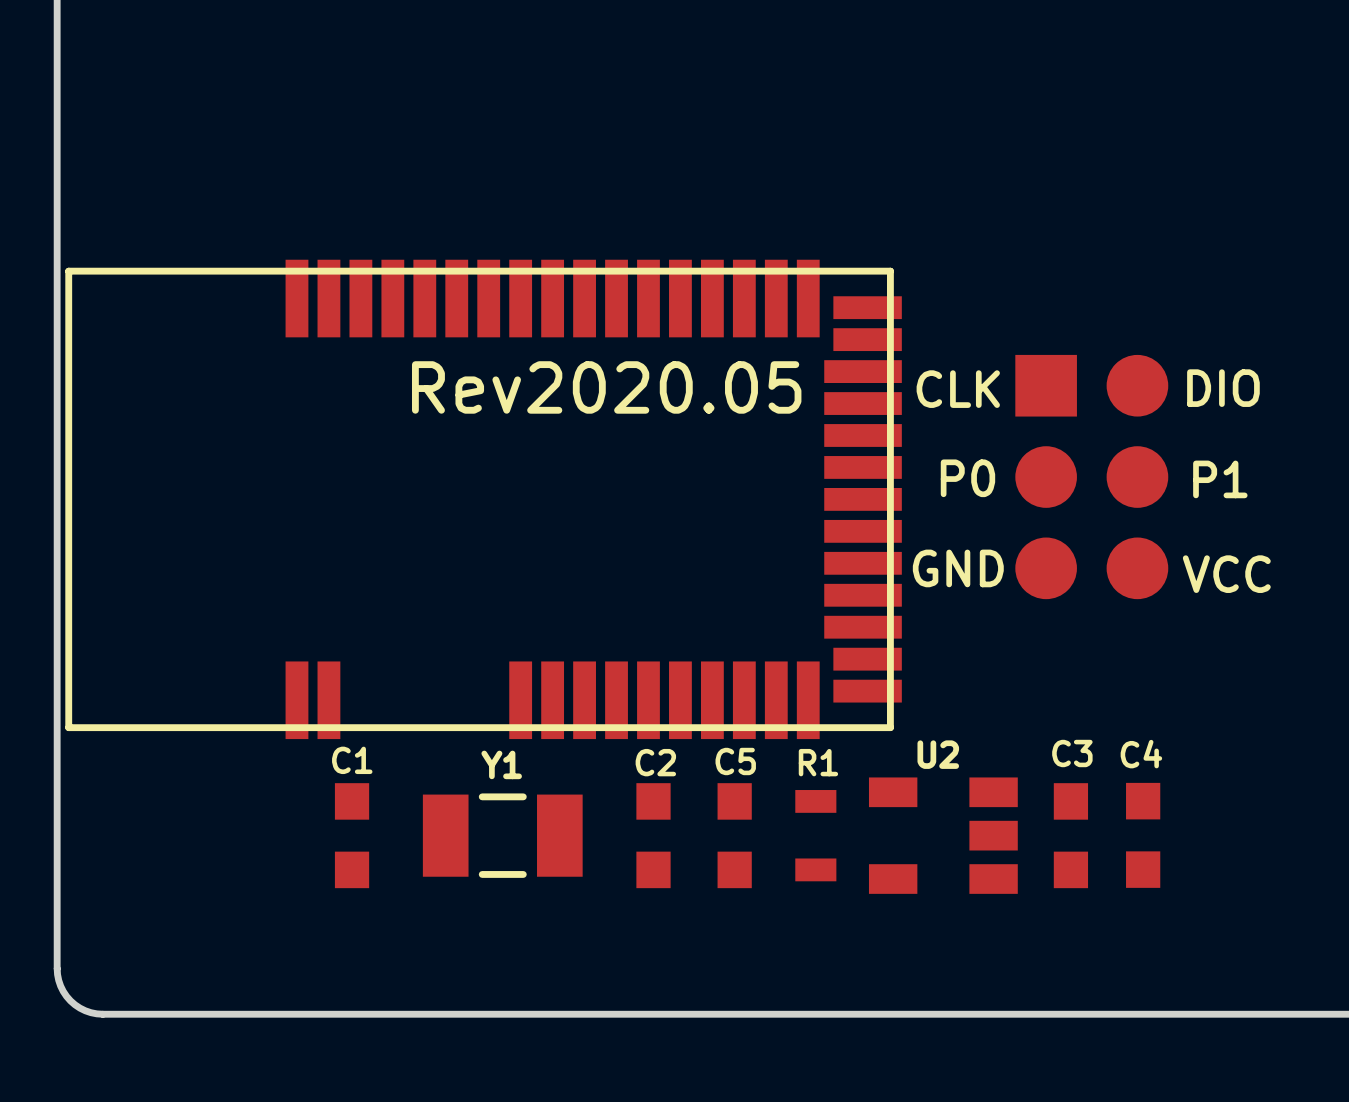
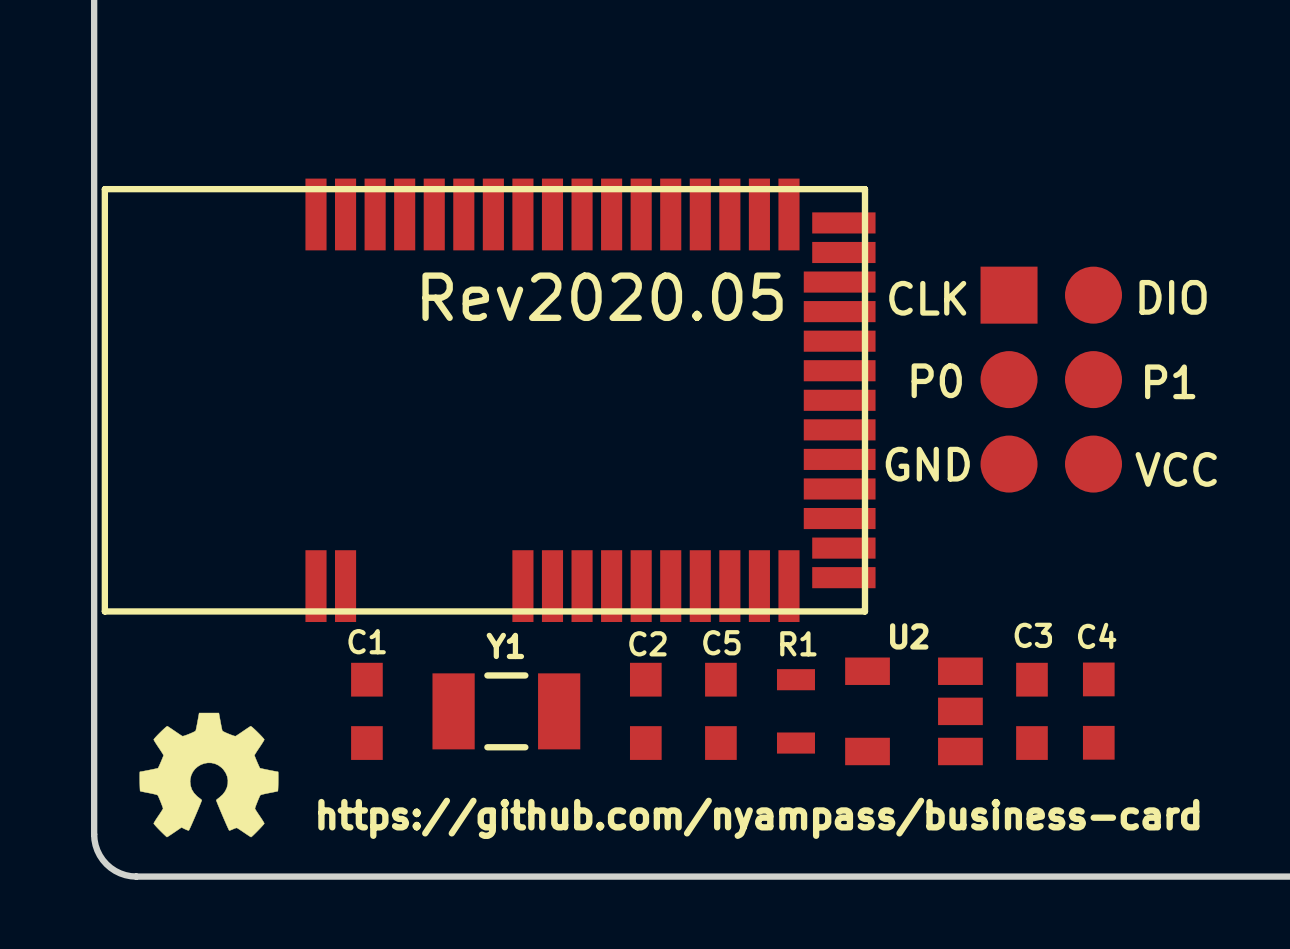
drawing: none -> [139, 712, 279, 838]
text: none -> https://github.com/nyampass/business-card (758, 818)

